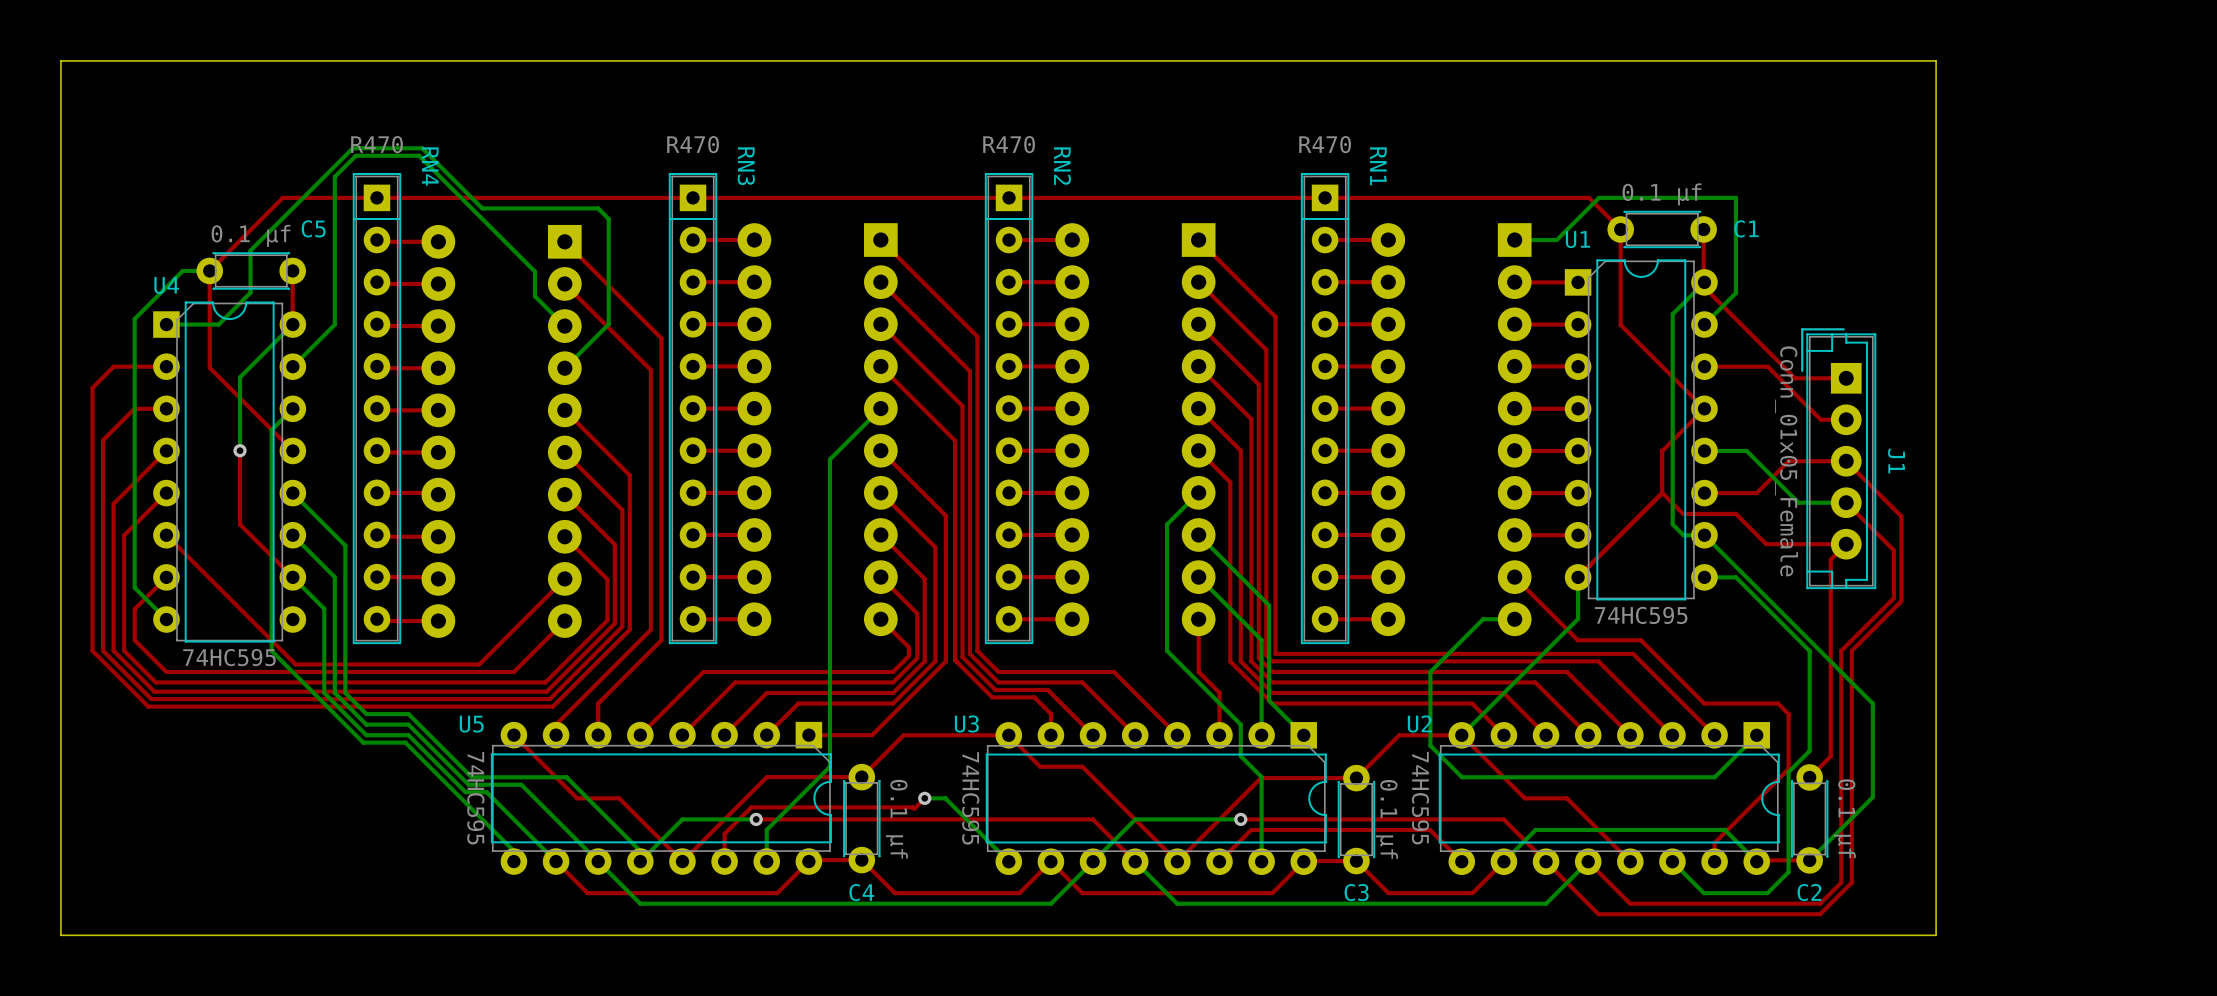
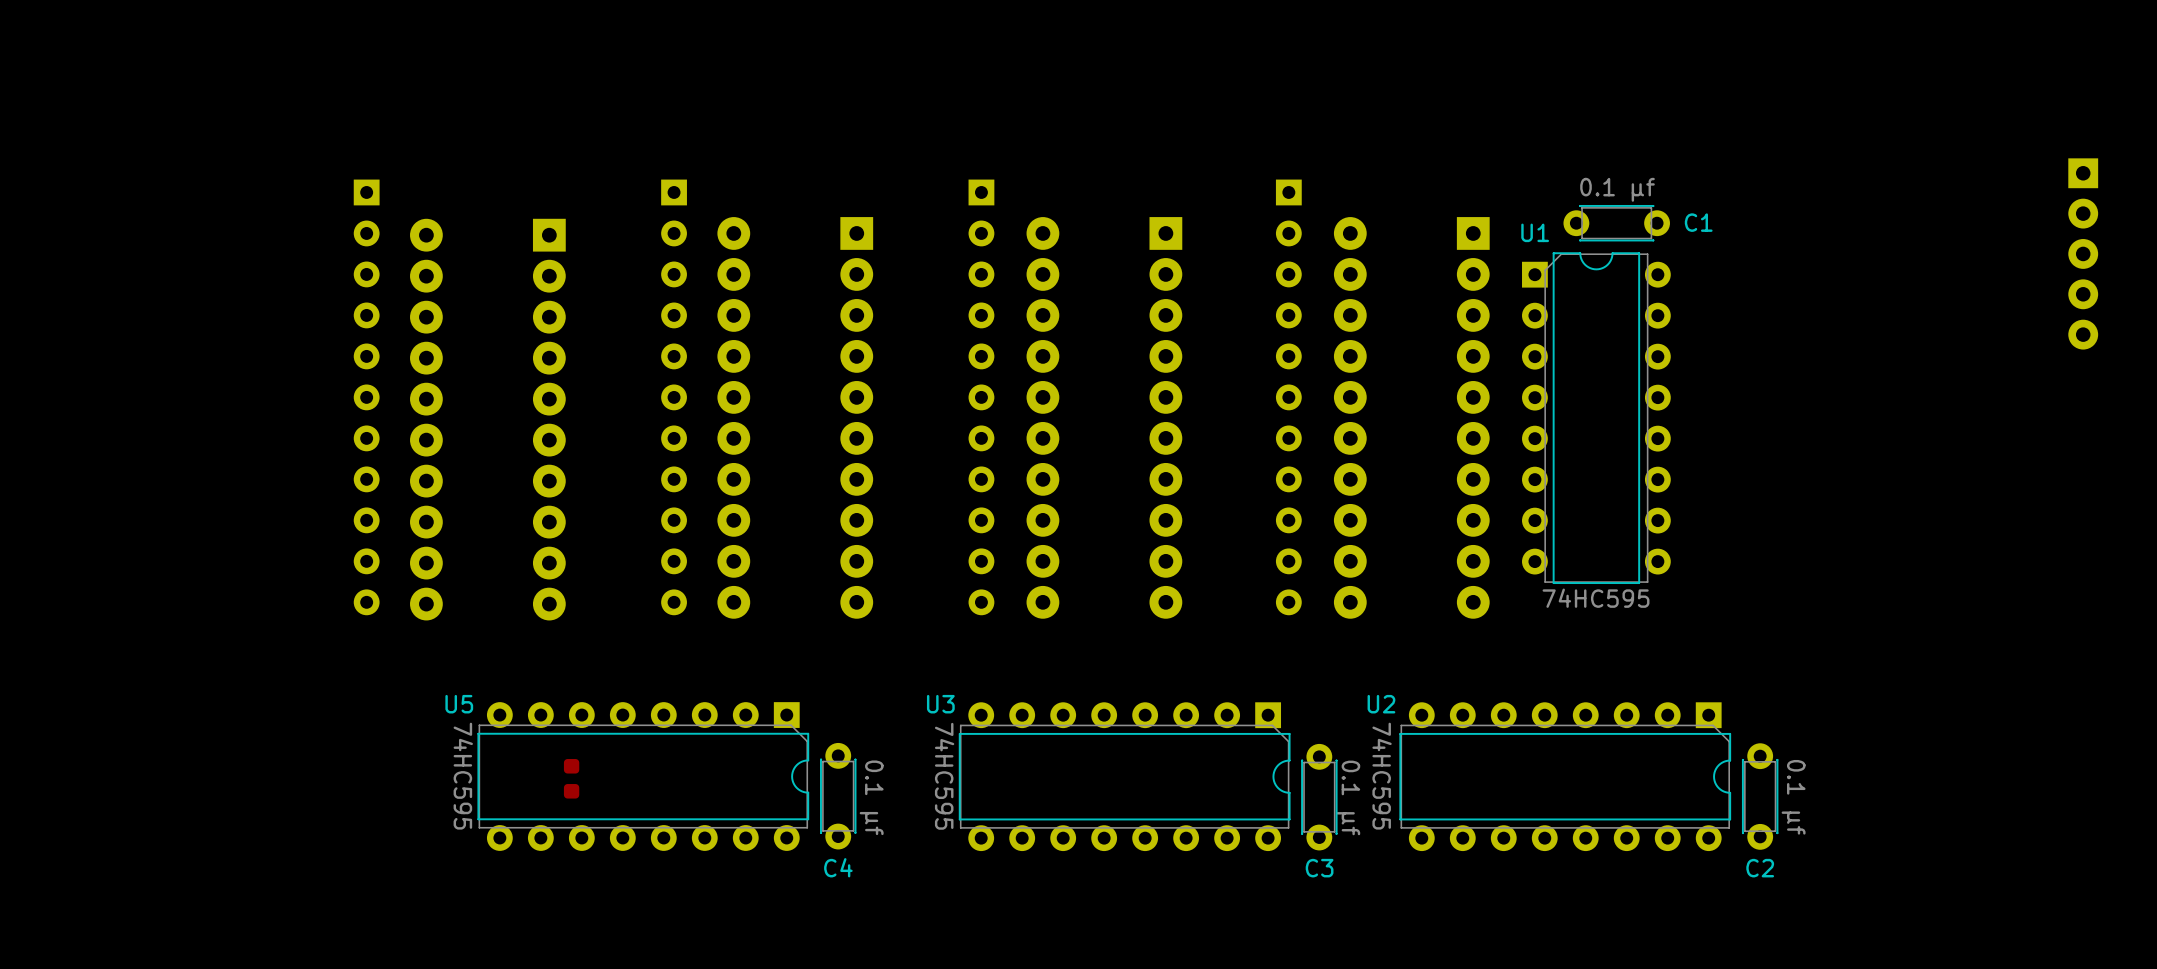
board edge: (1936, 60) (60, 60) (60, 935) (1936, 935) (1936, 60) -> none
top track: (1703, 229) (1704, 287) (1795, 378) (1846, 378) -> none
top track: (376, 240) (378, 241) (438, 241) -> none
top track: (754, 240) (693, 240) -> none
top track: (880, 240) (977, 336) (977, 650) (998, 671) (1113, 671) (1177, 735) -> none
top track: (1072, 240) (1009, 240) -> none
top track: (1198, 240) (1275, 316) (1275, 653) (1633, 653) (1714, 735) -> none
top track: (1388, 240) (1325, 240) -> none
bottom track: (1514, 240) (1556, 240) (1598, 197) (1735, 197) (1735, 293) (1704, 324) -> none
top track: (564, 241) (661, 338) (661, 640) (598, 703) (598, 735) -> none
bottom track: (209, 270) (182, 270) (134, 318) (134, 587) (166, 619) -> none
C5: 0.1 µf (251, 270) -> none
top track: (292, 270) (292, 324) -> none
top track: (376, 282) (378, 283) (438, 283) -> none
top track: (754, 282) (693, 282) -> none
top track: (880, 282) (969, 371) (969, 653) (998, 682) (1082, 682) (1135, 735) -> none
top track: (1072, 282) (1009, 282) -> none
top track: (1198, 282) (1266, 349) (1266, 655) (1272, 661) (1598, 661) (1672, 735) -> none
top track: (1388, 282) (1325, 282) -> none
top track: (1514, 282) (1578, 282) -> none
bottom track: (1704, 282) (1672, 314) (1672, 524) (1683, 535) (1704, 535) (1872, 703) (1872, 797) (1809, 860) -> none
top track: (564, 283) (650, 370) (650, 629) (556, 724) (556, 735) -> none
bottom track: (166, 324) (218, 324) (250, 292) (250, 250) (352, 148) (422, 148) (482, 208) (598, 208) (608, 218) (608, 324) (564, 368) -> none
bottom track: (292, 324) (240, 377) (240, 450) -> none
top track: (376, 324) (378, 326) (438, 326) -> none
top track: (754, 324) (693, 324) -> none
top track: (880, 324) (962, 405) (962, 657) (995, 689) (1047, 689) (1093, 735) -> none
top track: (1072, 324) (1009, 324) -> none
top track: (1198, 324) (1258, 384) (1258, 658) (1272, 671) (1566, 671) (1630, 735) -> none
top track: (1388, 324) (1325, 324) -> none
top track: (1514, 324) (1578, 324) -> none
bottom track: (564, 326) (534, 296) (534, 271) (419, 155) (355, 155) (334, 176) (334, 324) (292, 366) -> none
top track: (166, 366) (113, 366) (92, 387) (92, 650) (148, 706) (552, 706) (629, 629) (629, 475) (564, 410) -> none
top track: (376, 366) (378, 368) (438, 368) -> none
top track: (754, 366) (693, 366) -> none
top track: (880, 366) (955, 440) (955, 660) (992, 697) (1034, 697) (1050, 713) (1050, 735) -> none
top track: (1072, 366) (1009, 366) -> none
top track: (1198, 366) (1251, 419) (1251, 661) (1272, 682) (1535, 682) (1588, 735) -> none
top track: (1388, 366) (1325, 366) -> none
top track: (1514, 366) (1578, 366) -> none
top track: (1704, 366) (1767, 366) (1820, 419) (1846, 419) -> none
top track: (166, 408) (134, 408) (103, 440) (103, 650) (151, 699) (549, 699) (622, 626) (622, 510) (564, 452) -> none
bottom track: (292, 408) (271, 430) (271, 650) (363, 742) (405, 742) (513, 851) (513, 861) -> none
top track: (376, 408) (378, 410) (438, 410) -> none
RN4 side: bottom (376, 408) -> top (366, 397)
RN3 side: bottom (693, 408) -> top (674, 397)
top track: (754, 408) (693, 408) -> none
bottom track: (880, 408) (829, 459) (829, 766) (766, 829) (766, 861) -> none
RN2 side: bottom (1009, 408) -> top (981, 397)
top track: (1072, 408) (1009, 408) -> none
top track: (1198, 408) (1240, 450) (1240, 661) (1272, 693) (1503, 693) (1546, 735) -> none
RN1 side: bottom (1325, 408) -> top (1288, 397)
top track: (1388, 408) (1325, 408) -> none
top track: (1514, 408) (1578, 408) -> none
top track: (166, 450) (113, 503) (113, 650) (154, 691) (546, 691) (614, 623) (614, 544) (564, 494) -> none
top track: (240, 450) (240, 524) (292, 577) -> none
via: (240, 450) -> none
top track: (292, 450) (209, 367) (209, 270) (282, 197) (1589, 197) (1620, 229) (1620, 325) (1704, 408) (1662, 450) (1662, 493) (1578, 577) (1578, 576) (1662, 492) (1683, 513) (1735, 513) (1766, 544) (1846, 544) (1830, 559) (1830, 756) (1809, 777) -> none
top track: (376, 450) (378, 452) (438, 452) -> none
top track: (754, 450) (693, 450) -> none
top track: (880, 450) (945, 515) (945, 661) (872, 735) (808, 735) -> none
top track: (1072, 450) (1009, 450) -> none
top track: (1198, 450) (1230, 482) (1230, 661) (1272, 703) (1472, 703) (1503, 735) -> none
top track: (1388, 450) (1325, 450) -> none
top track: (1514, 450) (1578, 450) -> none
bottom track: (1704, 450) (1746, 450) (1798, 502) (1846, 502) -> none
J1 side: bottom (1838, 458) -> top (2083, 253)
U4: 74HC595 (229, 472) -> none
top track: (376, 492) (436, 492) (438, 494) -> none
top track: (754, 492) (693, 492) -> none
top track: (880, 492) (935, 547) (935, 661) (893, 703) (798, 703) (766, 735) -> none
top track: (1072, 492) (1009, 492) -> none
bottom track: (1198, 492) (1167, 524) (1167, 650) (1240, 724) (1240, 756) (1261, 777) (1261, 861) -> none
top track: (1388, 492) (1325, 492) -> none
top track: (1514, 492) (1578, 493) -> none
top track: (166, 493) (124, 535) (124, 650) (155, 682) (545, 682) (607, 620) (607, 579) (564, 536) -> none
bottom track: (292, 493) (345, 545) (345, 693) (366, 714) (408, 714) (471, 777) (566, 777) (640, 851) (640, 861) (682, 819) (756, 819) -> none
top track: (1704, 493) (1756, 493) (1788, 461) (1846, 461) (1901, 516) (1901, 601) (1851, 650) (1851, 882) (1820, 914) (1598, 914) (1503, 819) (1240, 819) -> none
top track: (1846, 502) (1893, 550) (1893, 598) (1841, 650) (1841, 882) (1820, 903) (1630, 903) (1588, 861) -> none
top track: (376, 534) (378, 536) (438, 536) -> none
top track: (754, 534) (693, 534) -> none
top track: (880, 534) (924, 578) (924, 661) (893, 693) (766, 693) (724, 735) -> none
top track: (1072, 534) (1009, 534) -> none
bottom track: (1198, 534) (1269, 605) (1269, 700) (1303, 735) -> none
top track: (1388, 534) (1325, 534) -> none
top track: (1514, 534) (1578, 535) -> none
top track: (166, 535) (295, 664) (479, 664) (564, 578) -> none
bottom track: (292, 535) (334, 577) (334, 693) (366, 724) (408, 724) (468, 784) (521, 784) (640, 903) (1051, 903) -> none
top track: (166, 577) (134, 609) (134, 640) (166, 671) (513, 671) (564, 621) -> none
bottom track: (292, 577) (324, 608) (324, 693) (366, 735) (408, 735) (465, 792) (486, 792) (556, 861) -> none
top track: (376, 577) (436, 577) (438, 578) -> none
top track: (754, 577) (693, 577) -> none
top track: (880, 577) (917, 613) (917, 658) (893, 682) (735, 682) (682, 735) -> none
top track: (1072, 577) (1009, 577) -> none
bottom track: (1198, 577) (1261, 640) (1261, 735) -> none
top track: (1388, 577) (1325, 577) -> none
top track: (1514, 577) (1577, 640) (1641, 640) (1704, 703) (1778, 703) (1788, 714) (1788, 768) (1714, 842) (1714, 861) -> none
bottom track: (1578, 577) (1578, 619) (1461, 735) -> none
bottom track: (1704, 577) (1736, 577) (1809, 650) (1809, 751) (1788, 772) (1788, 872) (1767, 893) (1703, 893) (1672, 861) -> none
top track: (376, 619) (378, 621) (438, 621) -> none
top track: (754, 619) (693, 619) -> none
top track: (880, 619) (908, 647) (908, 656) (893, 671) (703, 671) (640, 735) -> none
top track: (1072, 619) (1009, 619) -> none
top track: (1198, 619) (1198, 671) (1219, 692) (1219, 735) -> none
top track: (1388, 619) (1325, 619) -> none
bottom track: (1514, 619) (1483, 619) (1430, 671) (1430, 745) (1462, 777) (1714, 777) (1756, 735) -> none
top track: (513, 735) (577, 798) (619, 798) (682, 861) (766, 777) (861, 777) (903, 735) (1008, 735) (1040, 766) (1082, 766) (1177, 861) (1260, 778) (1356, 778) (1399, 735) (1461, 735) (1524, 798) (1566, 798) (1630, 861) -> none
bottom track: (924, 798) (945, 798) (1008, 861) -> none
top track: (924, 798) (914, 808) (751, 807) (724, 834) (724, 861) -> none
via: (924, 798) -> none
part: none -> (571, 778)
top track: (756, 819) (1092, 819) (1135, 861) -> none
via: (756, 819) -> none
bottom track: (1240, 819) (1135, 819) (1051, 903) -> none
via: (1240, 819) -> none
top track: (1809, 860) (1756, 861) -> none
top track: (556, 861) (587, 893) (777, 893) (810, 860) (861, 860) (894, 893) (1019, 893) (1050, 861) (1082, 893) (1272, 893) (1304, 861) (1356, 861) (1388, 893) (1472, 893) (1503, 861) -> none
top track: (1461, 861) (1430, 829) (1251, 829) (1219, 861) -> none
bottom track: (1588, 861) (1546, 903) (1177, 903) (1135, 861) -> none
bottom track: (1756, 861) (1725, 829) (1535, 829) (1503, 861) -> none

